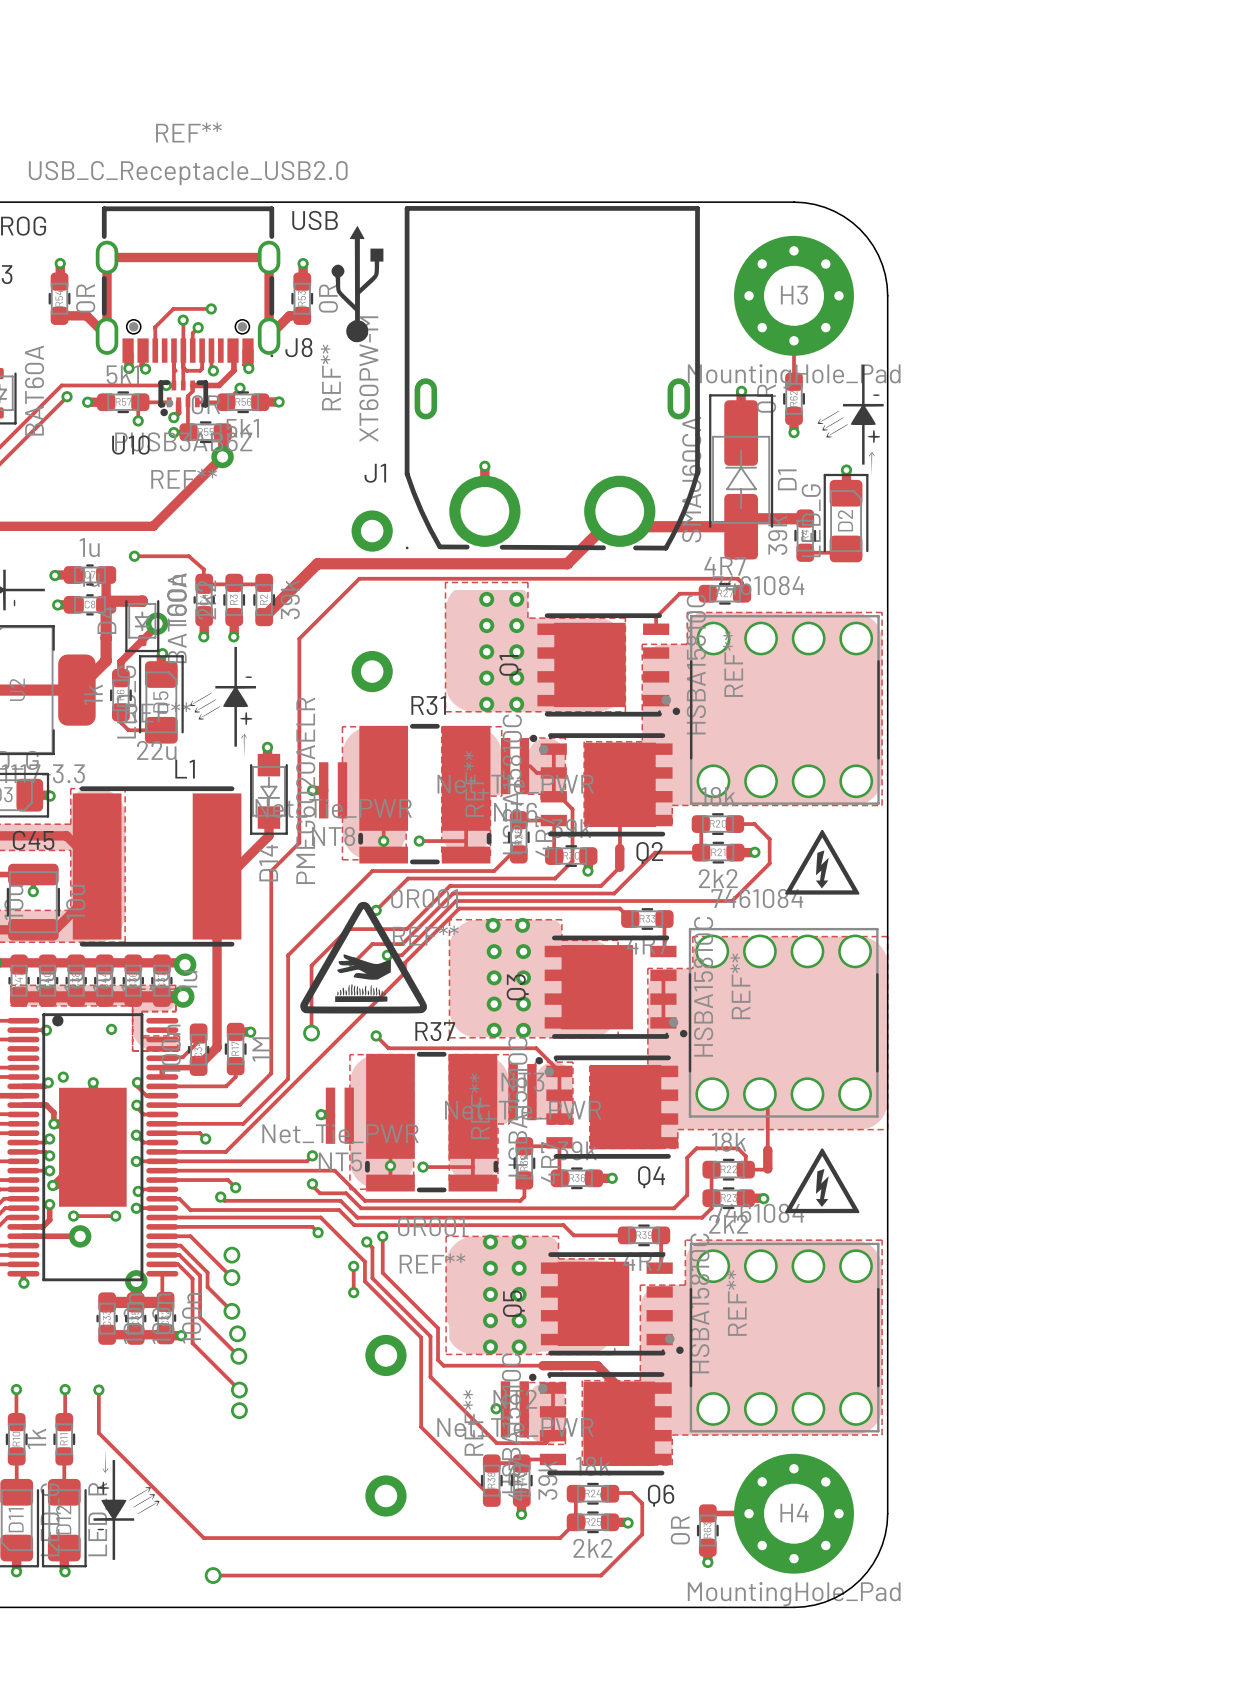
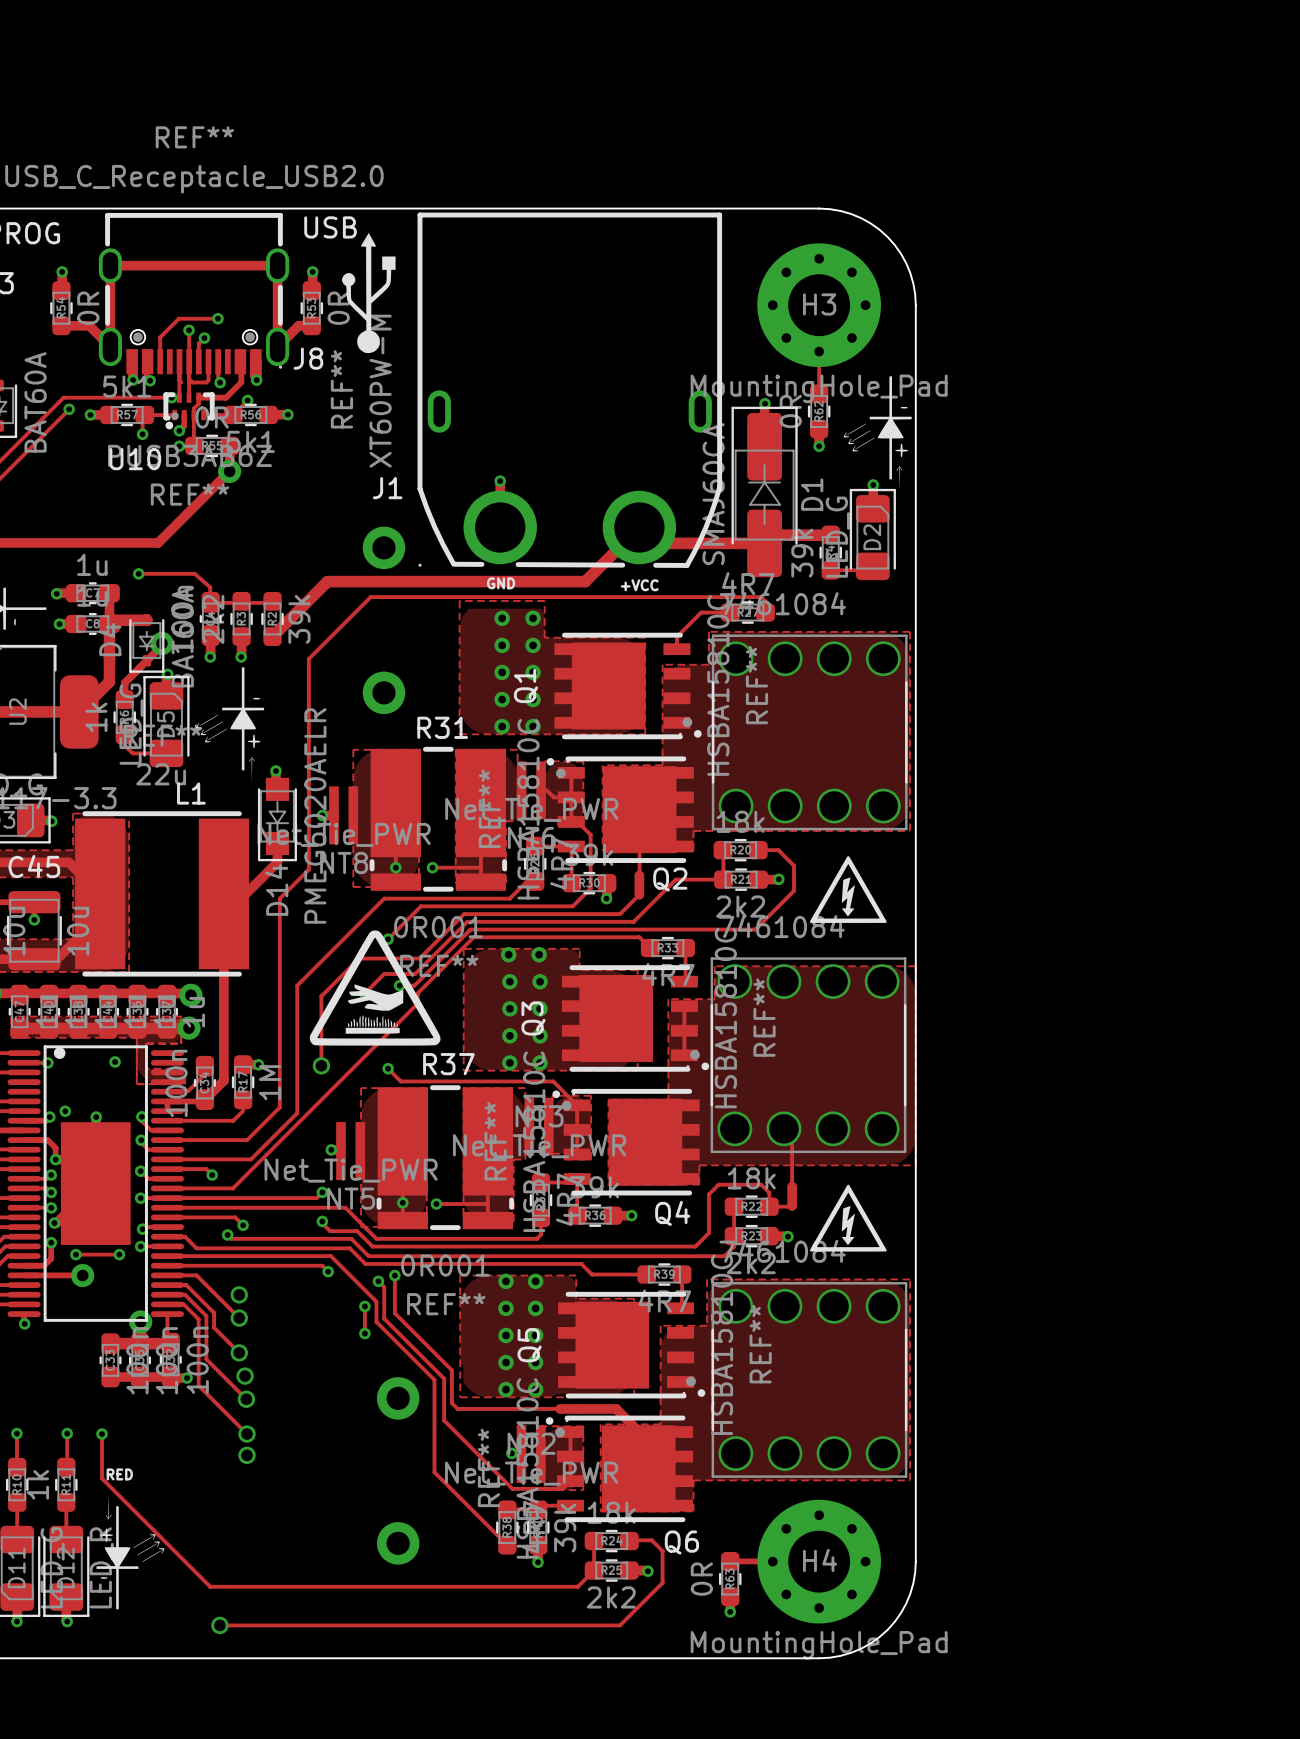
text: none -> GND (501, 583)
text: none -> +VCC (639, 585)
text: none -> RED (119, 1474)

